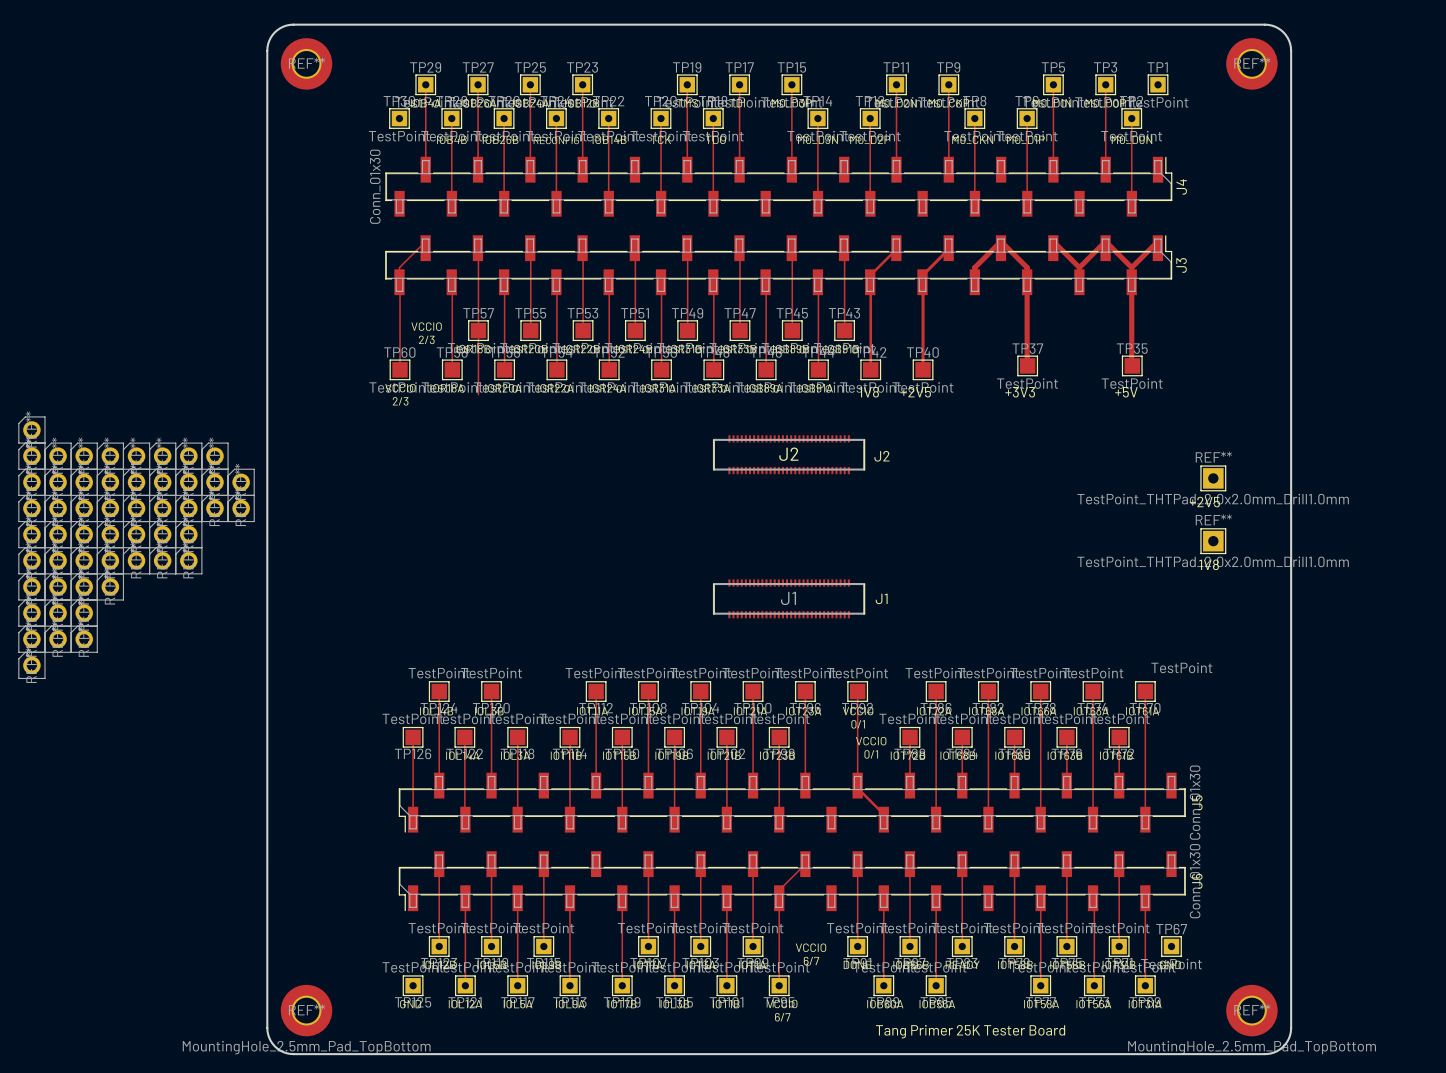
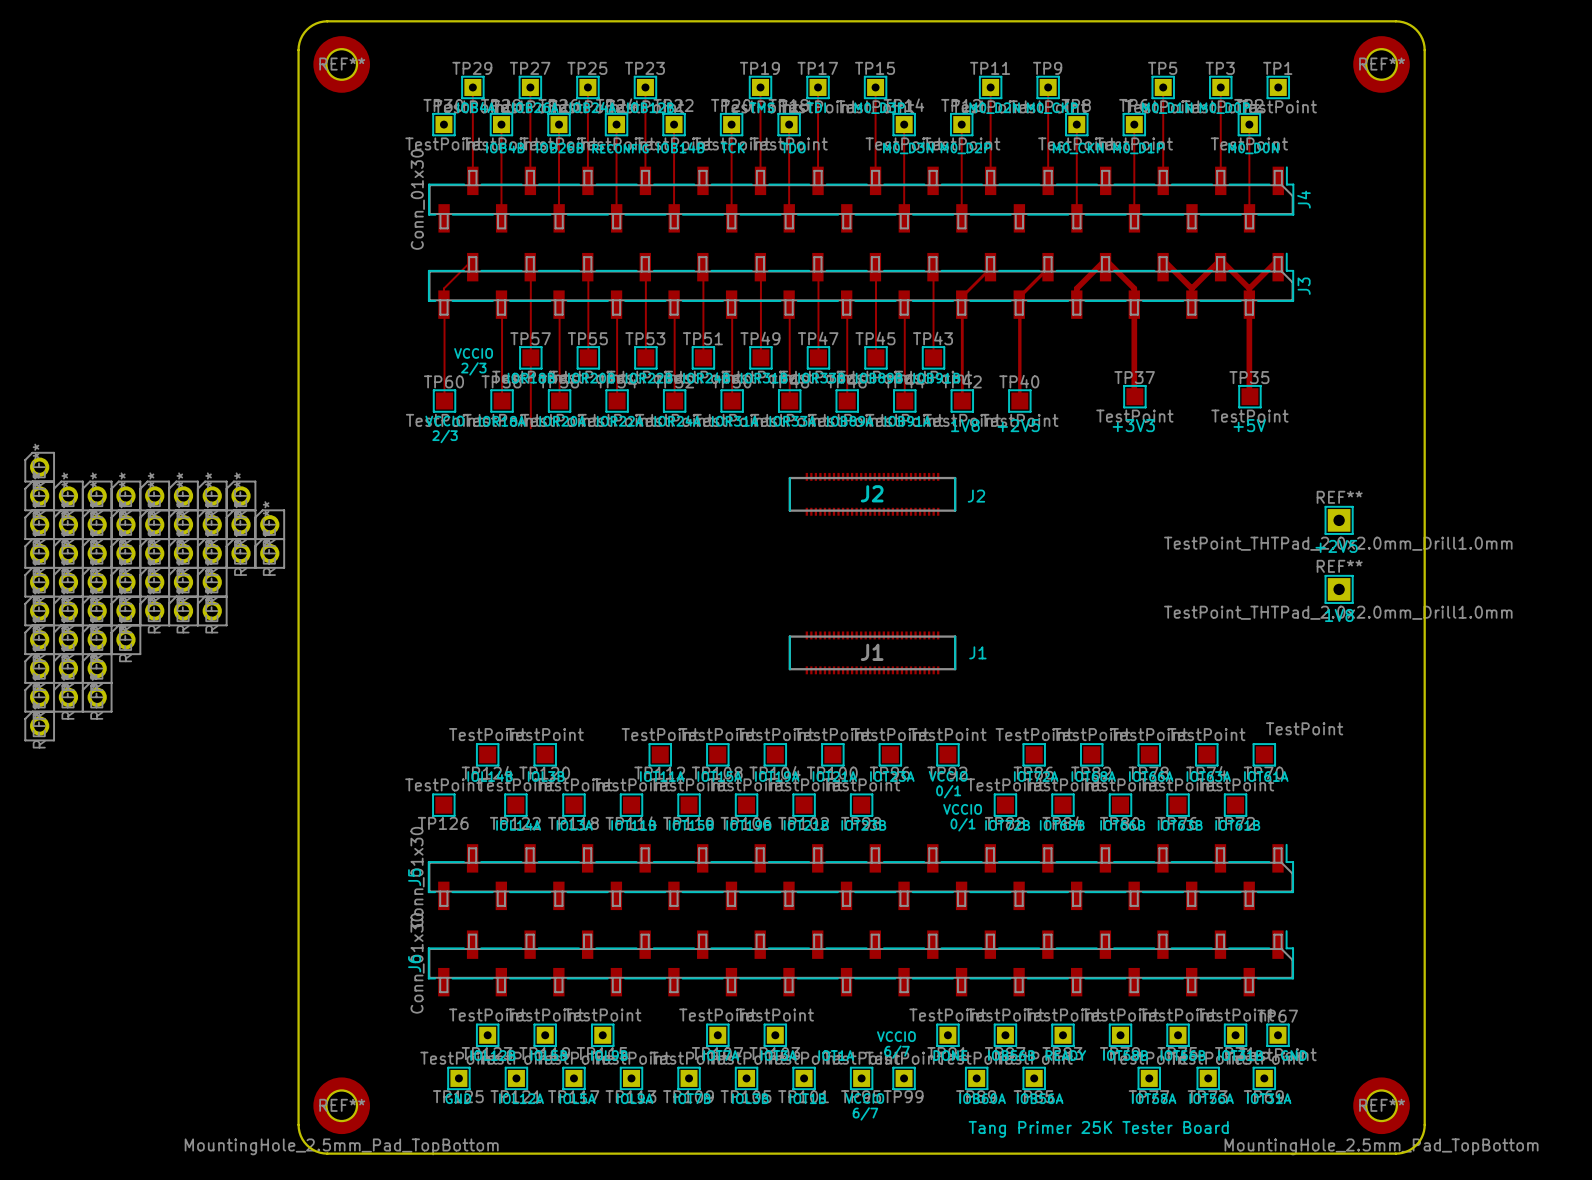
track: (439, 691) (439, 788) -> none
track: (491, 691) (491, 788) -> none
track: (596, 691) (596, 788) -> none
track: (648, 691) (648, 788) -> none
track: (700, 691) (700, 788) -> none
track: (753, 691) (753, 788) -> none
track: (805, 691) (805, 788) -> none
track: (857, 691) (857, 788) (883, 814) (883, 822) -> none
track: (936, 691) (936, 822) -> none
track: (988, 691) (988, 822) -> none
track: (1040, 691) (1040, 822) -> none
track: (1093, 691) (1093, 822) -> none
track: (1145, 691) (1145, 822) -> none
track: (413, 737) (413, 822) -> none
TP126 position: (413, 737) -> (443, 805)
track: (464, 737) (465, 822) -> none
track: (517, 737) (517, 822) -> none
track: (569, 737) (569, 822) -> none
track: (622, 737) (622, 822) -> none
track: (674, 737) (674, 822) -> none
track: (726, 737) (726, 822) -> none
track: (779, 737) (779, 822) -> none
track: (909, 737) (909, 788) -> none
track: (962, 737) (962, 788) -> none
track: (1014, 737) (1014, 788) -> none
track: (1066, 737) (1066, 788) -> none
track: (1119, 737) (1119, 788) -> none
J5 rotation: 0° (792, 802) -> 180° (860, 877)
track: (439, 864) (439, 946) -> none
track: (491, 864) (491, 946) -> none
track: (543, 864) (543, 946) -> none
track: (648, 864) (648, 946) -> none
track: (700, 864) (700, 946) -> none
track: (753, 864) (753, 946) -> none
track: (805, 864) (779, 890) (779, 985) -> none
track: (857, 864) (857, 946) -> none
track: (909, 864) (909, 946) -> none
track: (962, 864) (962, 946) -> none
track: (1014, 864) (1014, 946) -> none
track: (1066, 864) (1066, 946) -> none
track: (1119, 864) (1119, 946) -> none
J6 rotation: 0° (792, 881) -> 180° (860, 963)
track: (465, 898) (465, 985) -> none
track: (517, 898) (517, 985) -> none
track: (569, 898) (569, 985) -> none
track: (622, 898) (622, 985) -> none
track: (674, 898) (674, 985) -> none
track: (726, 898) (726, 985) -> none
track: (883, 898) (883, 985) -> none
track: (936, 898) (936, 985) -> none
track: (1040, 898) (1040, 985) -> none
track: (1093, 898) (1094, 985) -> none
track: (1145, 898) (1145, 985) -> none
TP99 position: (753, 946) -> (904, 1078)
TP67 position: (1171, 946) -> (1278, 1035)

